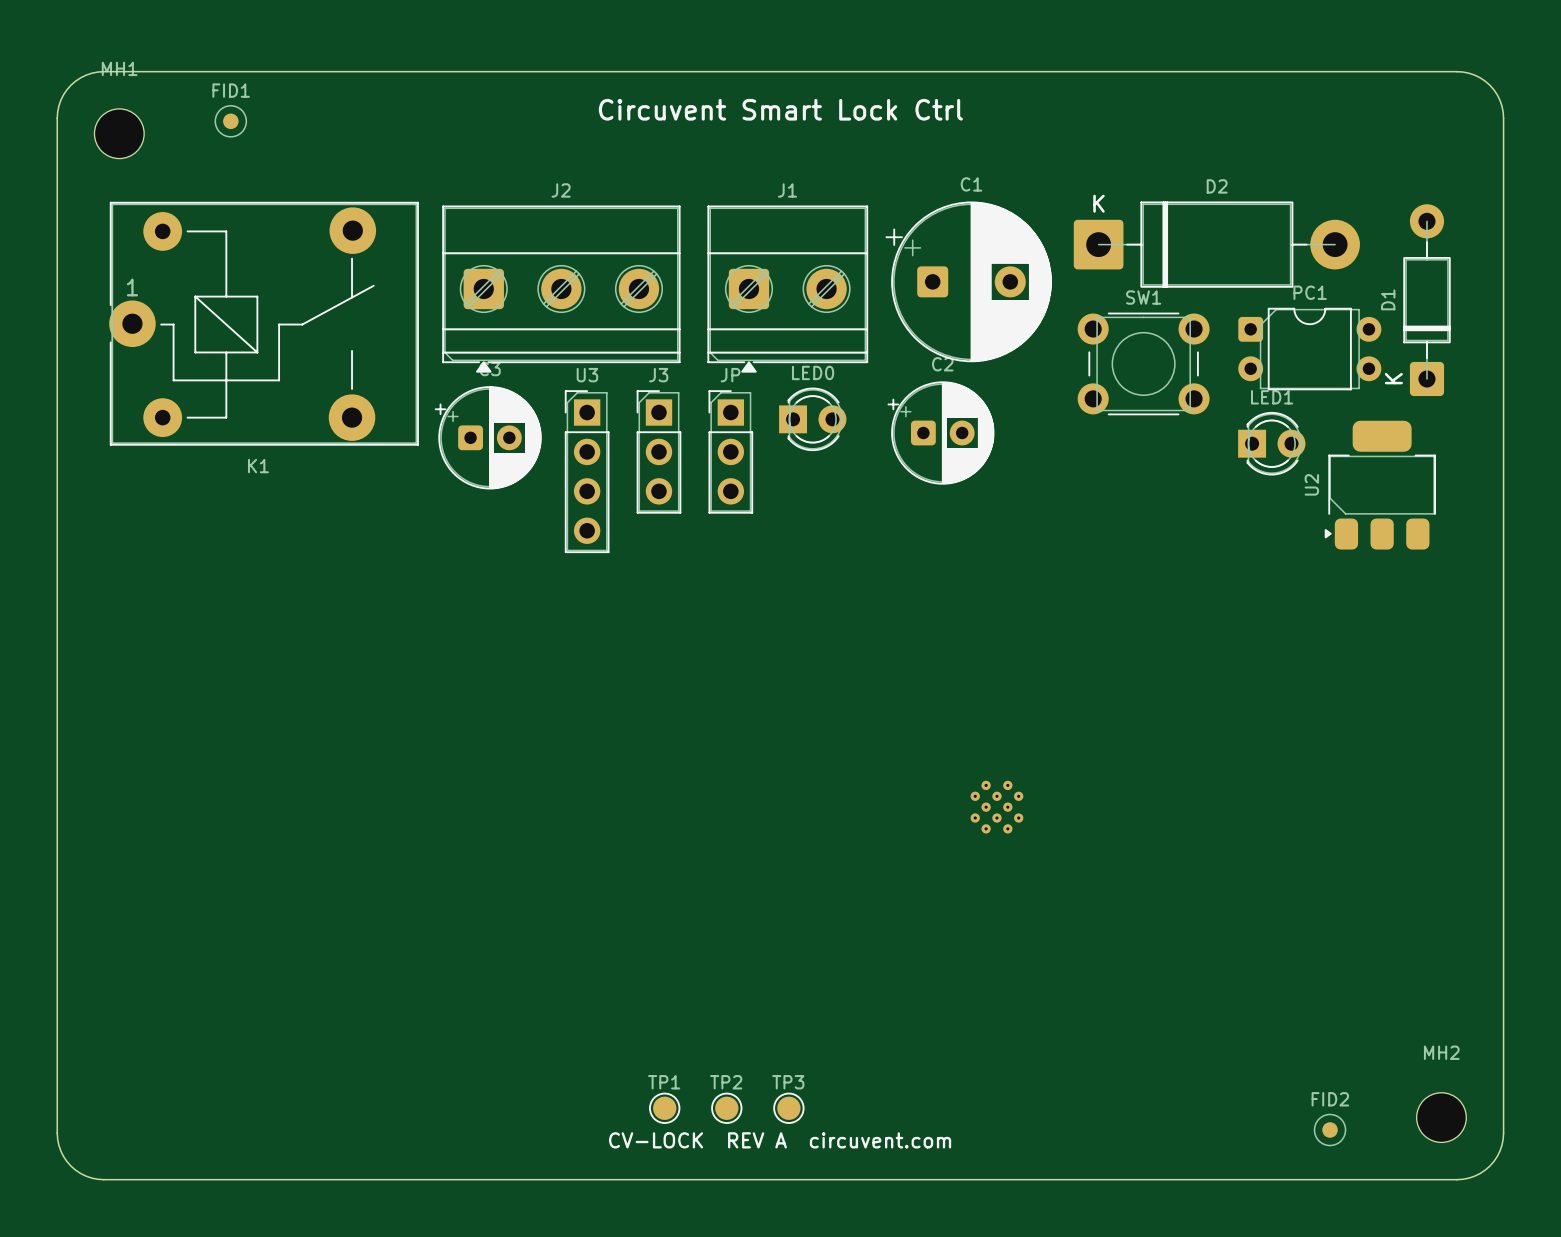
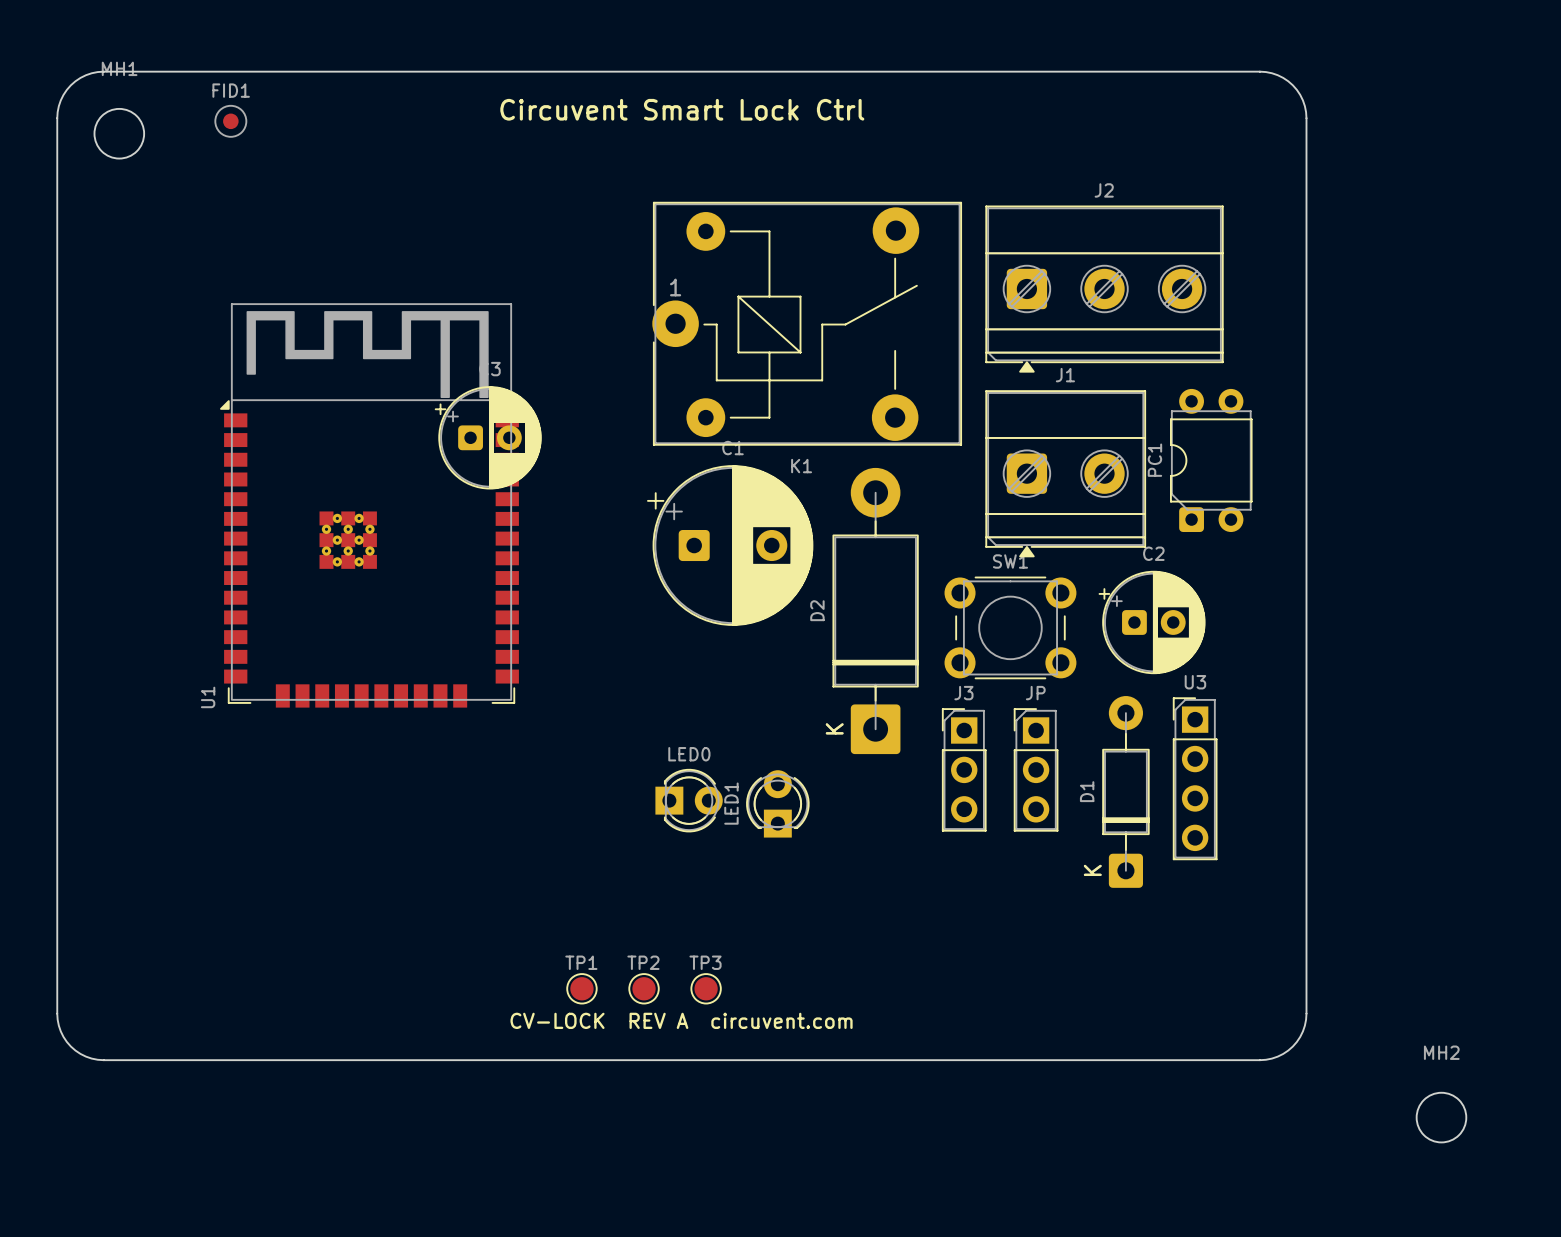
board edge: (1259, 71) (1463, 72) (1474, 75) (1485, 81) (1497, 94) (1501, 106) (1503, 118) (1503, 1133) (1500, 1150) (1493, 1161) (1485, 1170) (1474, 1176) (1457, 1179) (97, 1179) (85, 1176) (75, 1170) (63, 1156) (58, 1145) (57, 1013) -> (1259, 71) (1277, 75) (1292, 85) (1302, 100) (1306, 118) (1306, 1013) (1304, 1025) (1300, 1036) (1288, 1050) (1277, 1056) (1259, 1060) (103, 1060) (85, 1056) (70, 1046) (60, 1031) (57, 1013)
text position: Circuvent Smart Lock Ctrl (780, 109) -> Circuvent Smart Lock Ctrl (682, 109)
D2 rotation: 0° (1216, 244) -> 90° counterclockwise (875, 611)
D2 position: (1216, 244) -> (875, 611)
C1 position: (968, 281) -> (730, 545)
J2 position: (561, 289) -> (1104, 289)
J1 position: (787, 289) -> (1065, 473)
D1 position: (1426, 300) -> (1125, 791)
K1 position: (264, 323) -> (807, 323)
PC1 rotation: 0° (1309, 349) -> 90° counterclockwise (1211, 460)
PC1 position: (1309, 349) -> (1211, 460)
SW1 position: (1143, 363) -> (1010, 627)
LED0 position: (812, 419) -> (689, 800)
C2 position: (941, 433) -> (1152, 622)
LED1 rotation: 0° (1271, 443) -> 90° counterclockwise (777, 803)
LED1 position: (1271, 443) -> (777, 803)
J3 position: (658, 451) -> (964, 769)
JP: (730, 451) -> none
U3 position: (587, 471) -> (1195, 778)
U2: (1380, 485) -> none
U1: none -> (369, 505)
JP: none -> (1036, 769)
part: (996, 807) -> none
TP1 position: (664, 1108) -> (581, 988)
TP2 position: (726, 1108) -> (644, 988)
TP3 position: (788, 1108) -> (706, 988)
FID2: (1330, 1130) -> none
text position: CV-LOCK REV A circuvent.com (780, 1140) -> CV-LOCK REV A circuvent.com (681, 1020)

